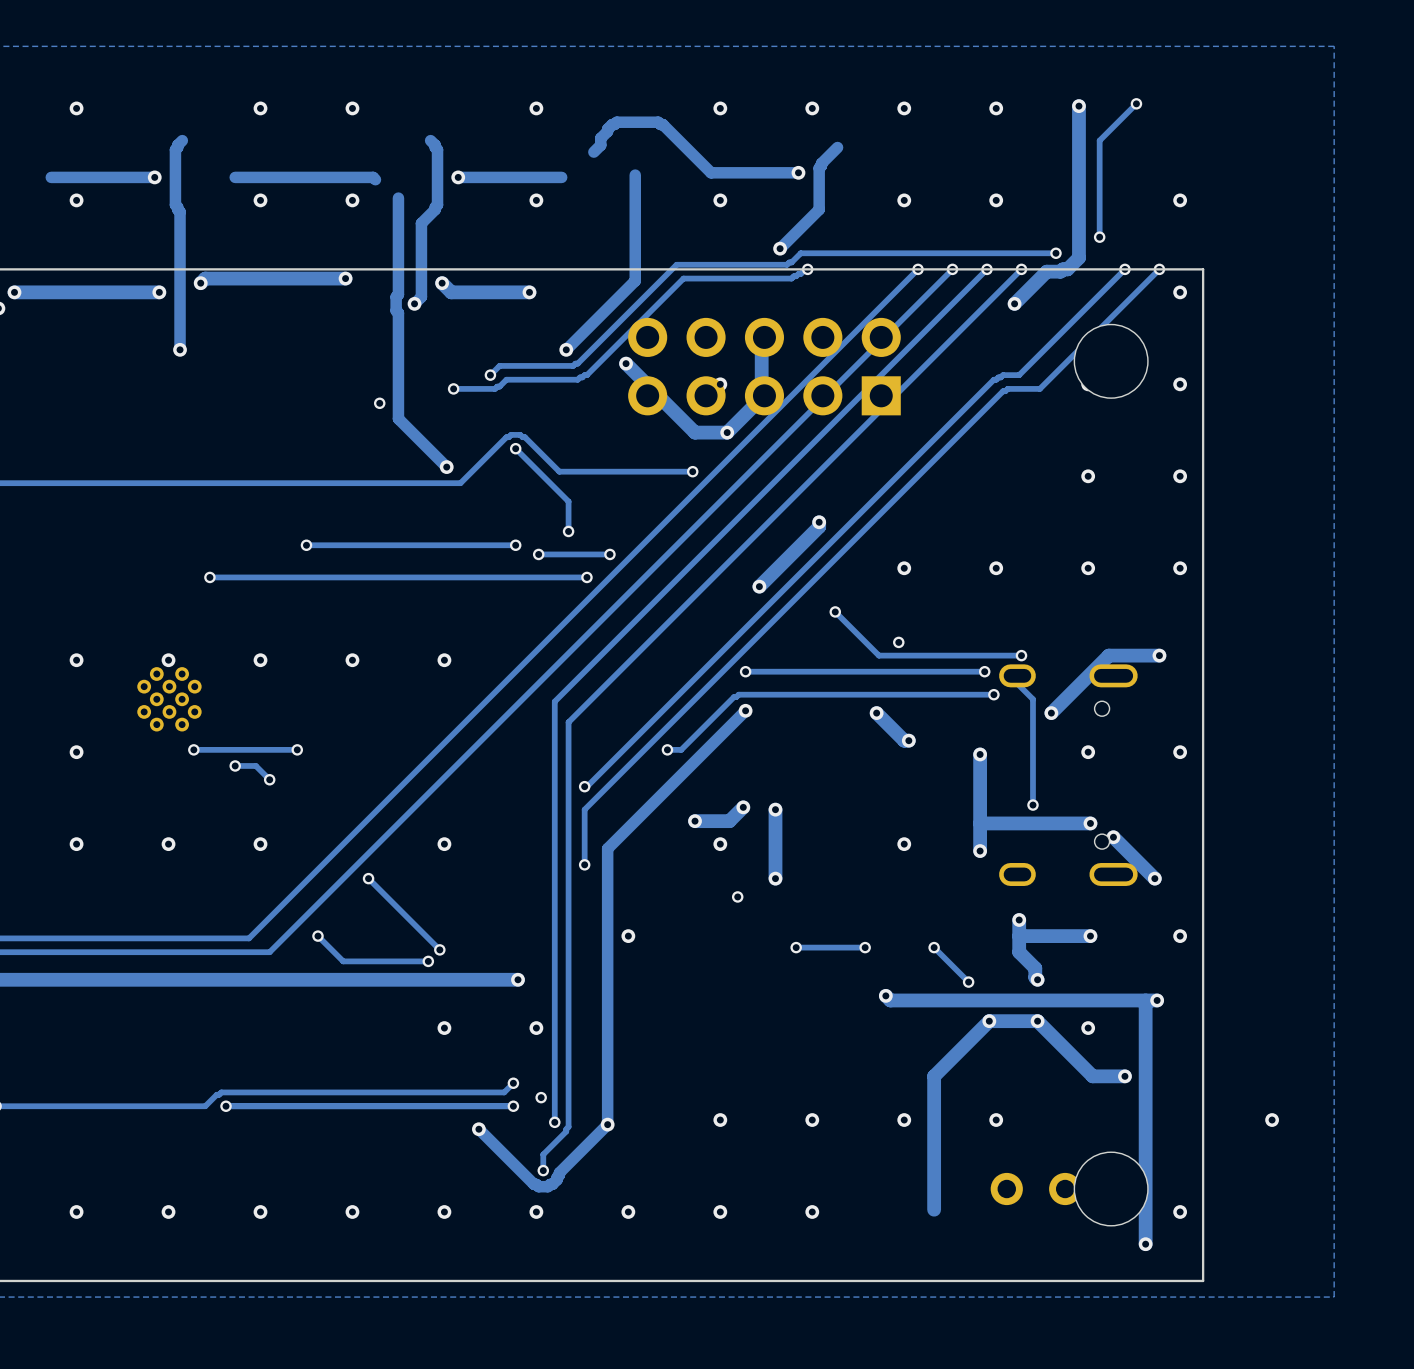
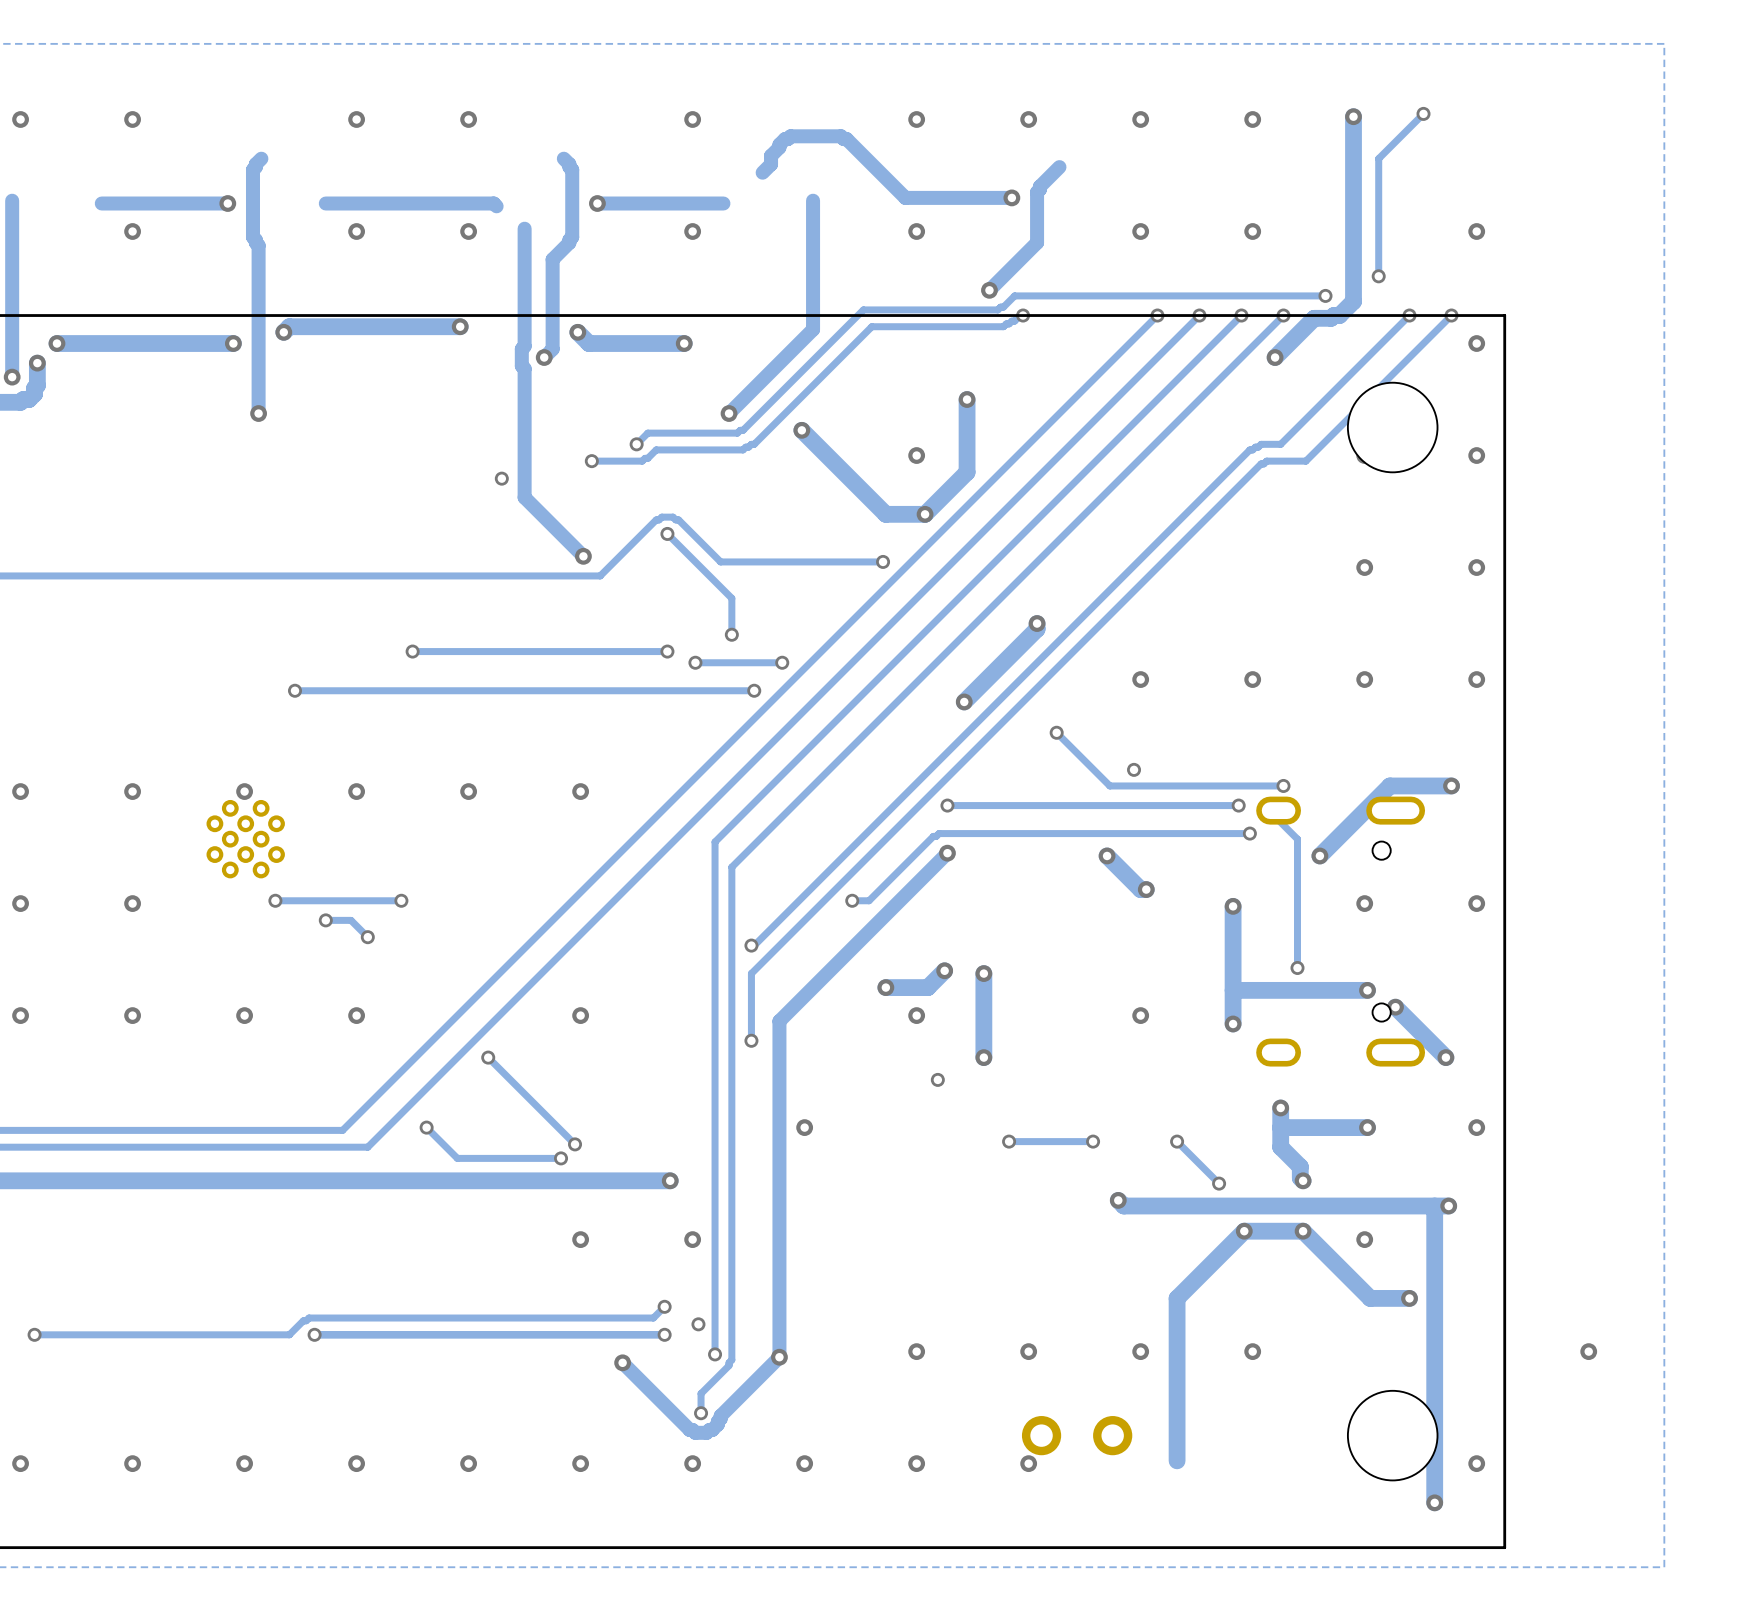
part: (764, 366) -> none
part position: (1035, 1189) -> (1077, 1435)

